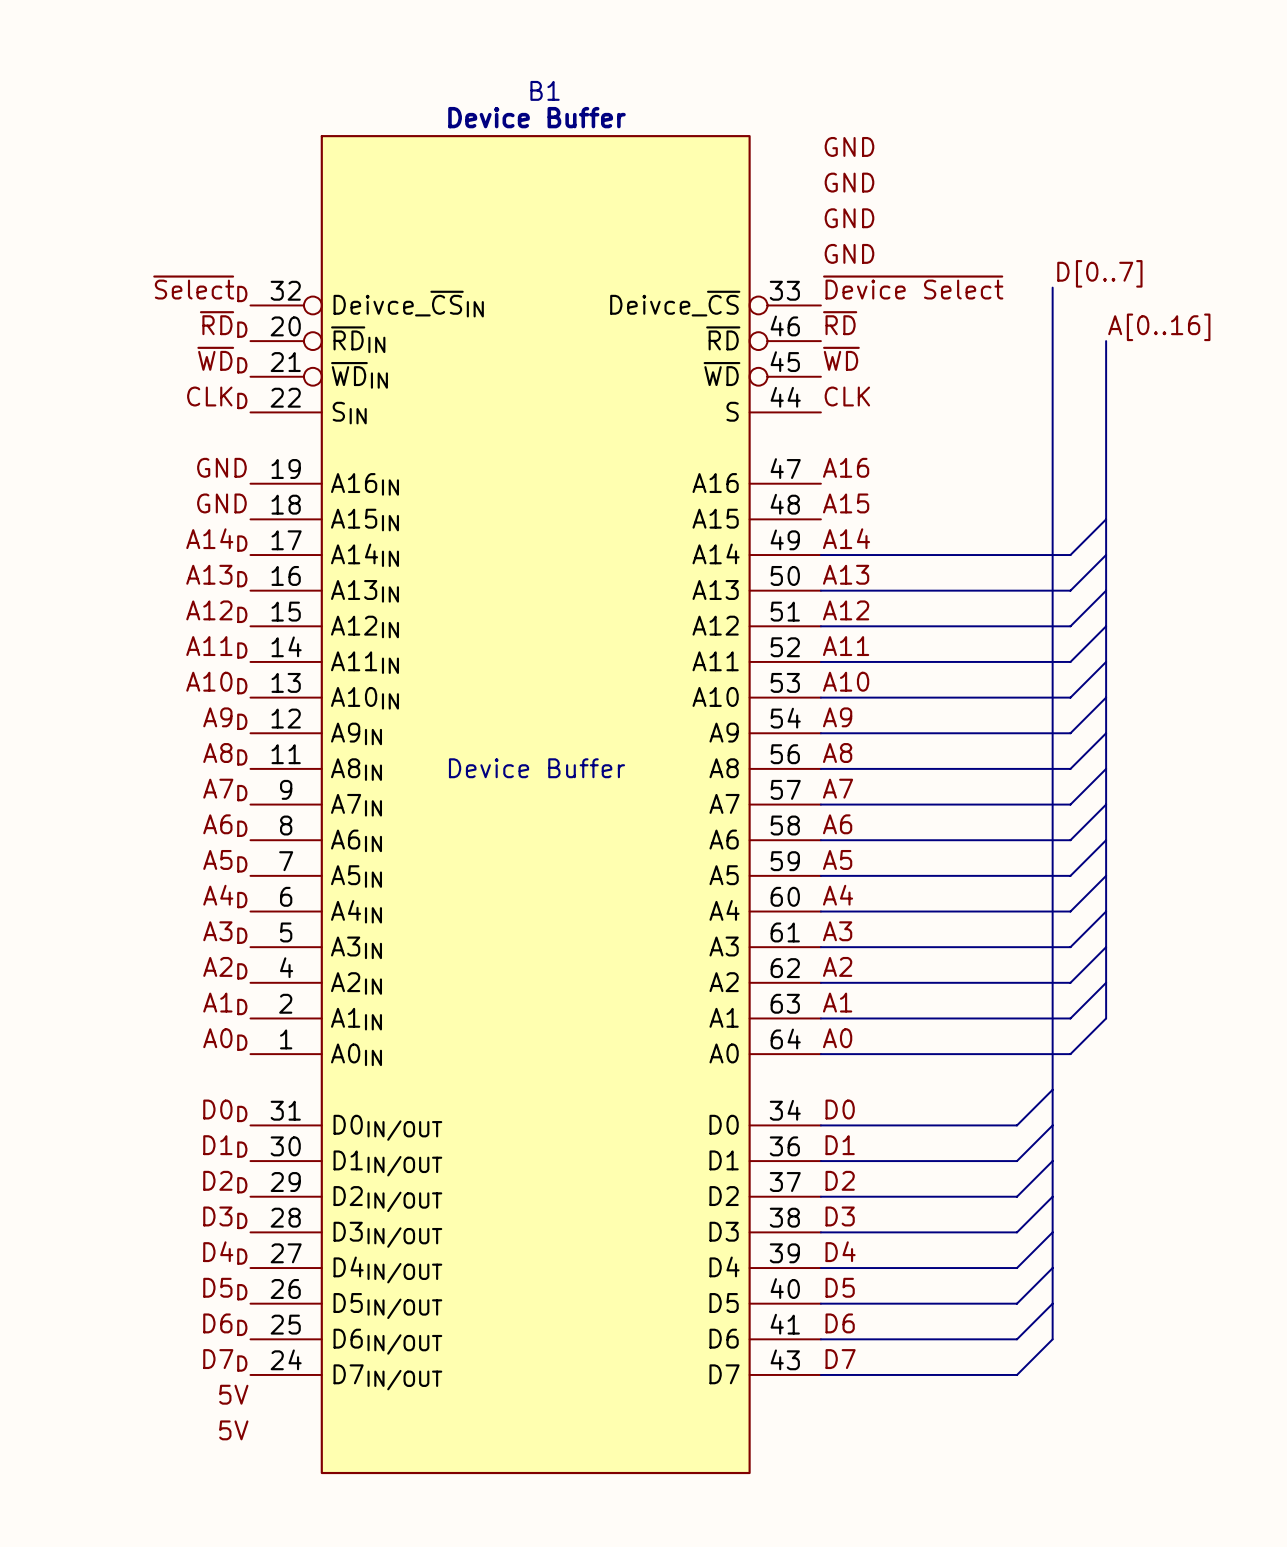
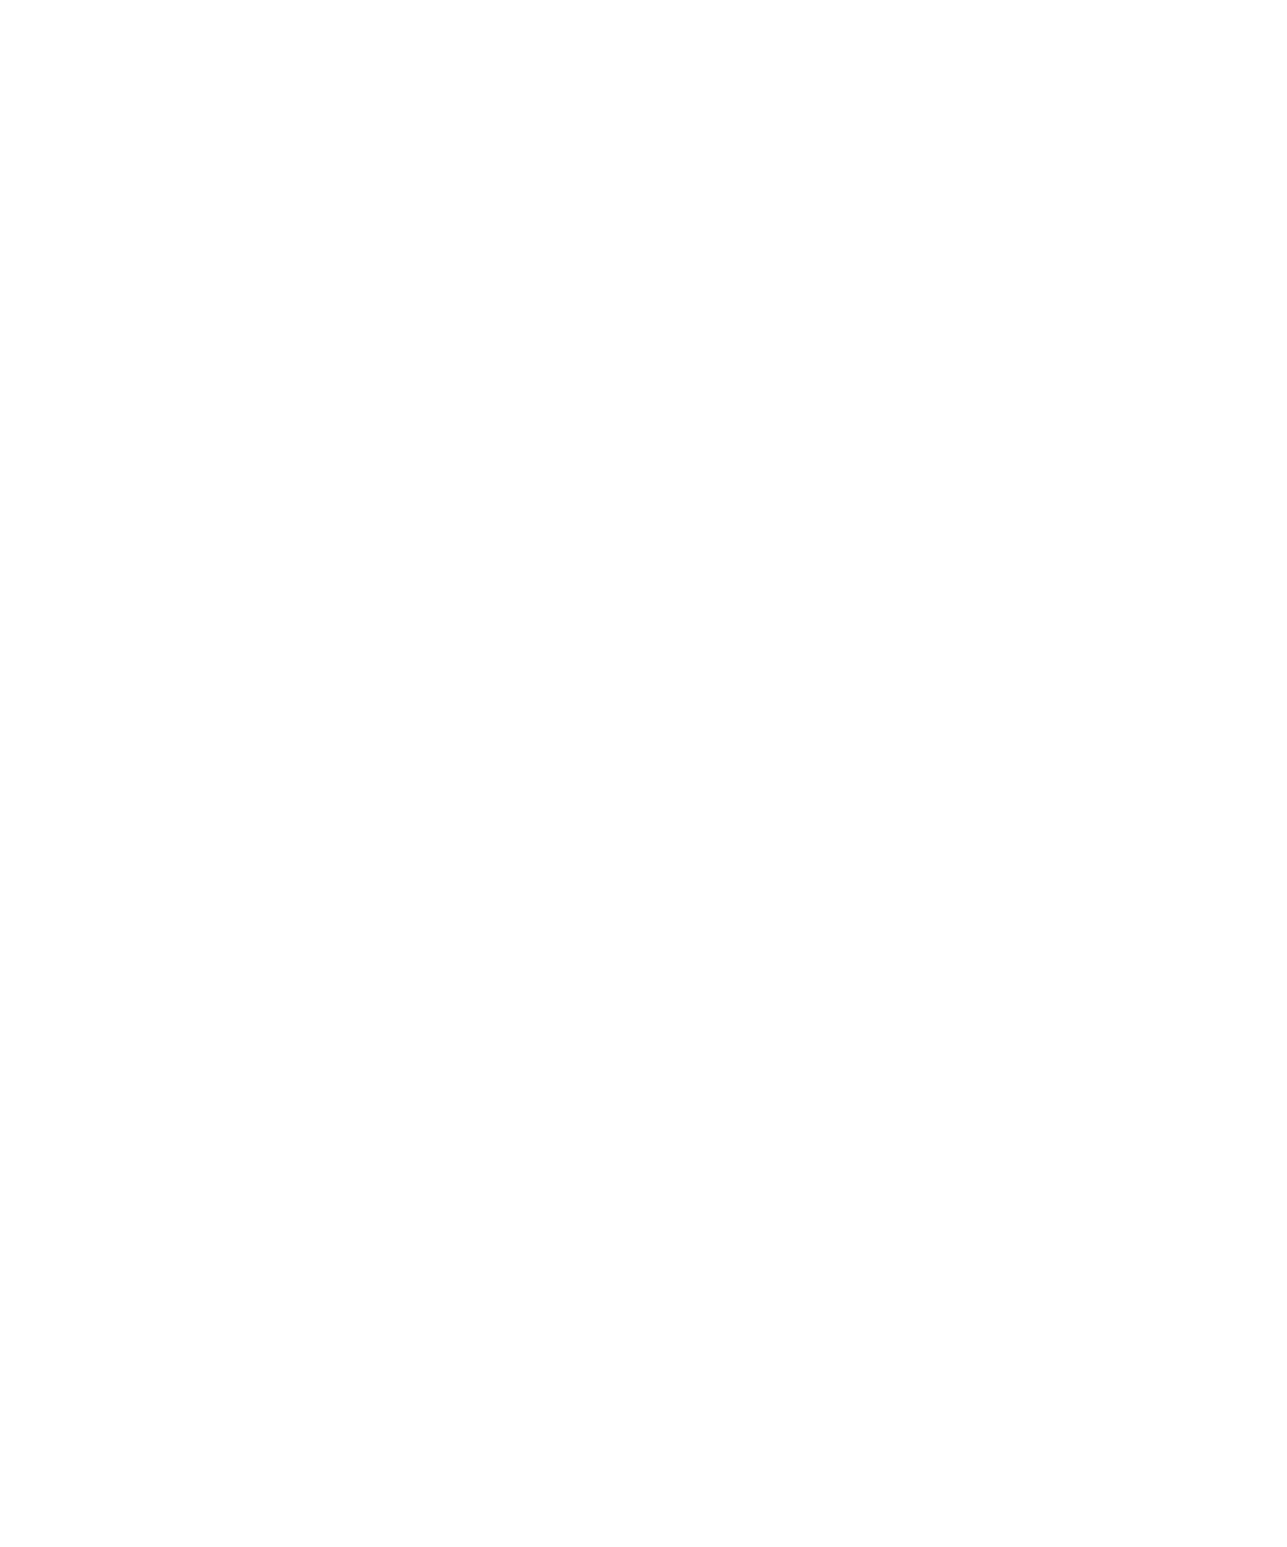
label: GND (849, 146) -> none
label: GND (849, 182) -> none
label: GND (849, 218) -> none
label: GND (849, 253) -> none
label: D[0..7] (1099, 273) -> none
label: ~{Device Select} (913, 287) -> none
bus: (1052, 287) (1052, 1339) -> none
label: ~{Select}D (200, 288) -> none
label: ~{RD} (840, 323) -> none
label: ~{RD}D (223, 324) -> none
label: A[0..16] (1159, 327) -> none
bus: (1106, 341) (1106, 1018) -> none
label: ~{WD} (841, 358) -> none
label: ~{WD}D (222, 360) -> none
label: CLK (847, 396) -> none
label: CLKD (217, 397) -> none
label: GND (221, 467) -> none
label: A16 (846, 467) -> none
label: GND (221, 503) -> none
label: A15 (846, 503) -> none
wire: (1106, 519) (1070, 555) (820, 555) -> none
label: A14 (846, 538) -> none
label: A14D (216, 540) -> none
wire: (1106, 555) (1070, 590) (820, 590) -> none
label: A13 (846, 574) -> none
label: A13D (216, 576) -> none
wire: (1106, 590) (1070, 626) (820, 626) -> none
label: A12 (846, 610) -> none
label: A12D (216, 611) -> none
wire: (1106, 626) (1070, 661) (820, 661) -> none
label: A11 (846, 646) -> none
label: A11D (216, 647) -> none
wire: (1106, 661) (1070, 697) (820, 697) -> none
label: A10 (846, 681) -> none
label: A10D (216, 683) -> none
wire: (1106, 697) (1070, 733) (820, 733) -> none
label: A9 (837, 717) -> none
label: A9D (225, 718) -> none
wire: (1106, 733) (1070, 768) (820, 768) -> none
label: A8 (837, 753) -> none
label: A8D (225, 754) -> none
wire: (1106, 768) (1070, 804) (820, 804) -> none
label: A7 (838, 788) -> none
label: A7D (225, 789) -> none
B1: Device Buffer (535, 804) -> none
wire: (1106, 804) (1070, 840) (820, 840) -> none
label: A6 (837, 824) -> none
label: A6D (225, 825) -> none
wire: (1106, 840) (1070, 875) (820, 875) -> none
label: A5 (837, 859) -> none
label: A5D (225, 861) -> none
wire: (1106, 875) (1070, 911) (820, 911) -> none
label: A4 (838, 895) -> none
label: A4D (225, 896) -> none
wire: (1106, 911) (1070, 947) (820, 947) -> none
label: A3 (837, 931) -> none
label: A3D (225, 932) -> none
wire: (1106, 947) (1070, 982) (820, 982) -> none
label: A2 (837, 966) -> none
label: A2D (225, 968) -> none
wire: (1106, 982) (1070, 1018) (820, 1018) -> none
label: A1 (837, 1002) -> none
label: A1D (225, 1003) -> none
wire: (1106, 1018) (1070, 1054) (820, 1054) -> none
label: A0 (837, 1038) -> none
label: A0D (225, 1039) -> none
wire: (1052, 1089) (1016, 1125) (820, 1125) -> none
label: D0 (840, 1109) -> none
label: D0D (225, 1110) -> none
wire: (1052, 1125) (1016, 1161) (820, 1161) -> none
label: D1 (840, 1145) -> none
label: D1D (225, 1146) -> none
wire: (1052, 1161) (1016, 1196) (820, 1196) -> none
label: D2 (840, 1180) -> none
label: D2D (225, 1182) -> none
wire: (1052, 1196) (1016, 1232) (820, 1232) -> none
label: D3 (840, 1216) -> none
label: D3D (225, 1217) -> none
wire: (1052, 1232) (1016, 1268) (820, 1268) -> none
label: D4 (840, 1251) -> none
label: D4D (225, 1253) -> none
wire: (1052, 1268) (1016, 1303) (820, 1303) -> none
label: D5 (840, 1287) -> none
label: D5D (225, 1289) -> none
wire: (1052, 1303) (1016, 1339) (820, 1339) -> none
label: D6 (840, 1323) -> none
label: D6D (225, 1324) -> none
wire: (1052, 1339) (1016, 1374) (820, 1374) -> none
label: D7 (840, 1359) -> none
label: D7D (225, 1360) -> none
label: 5V (233, 1394) -> none
label: 5V (233, 1430) -> none

